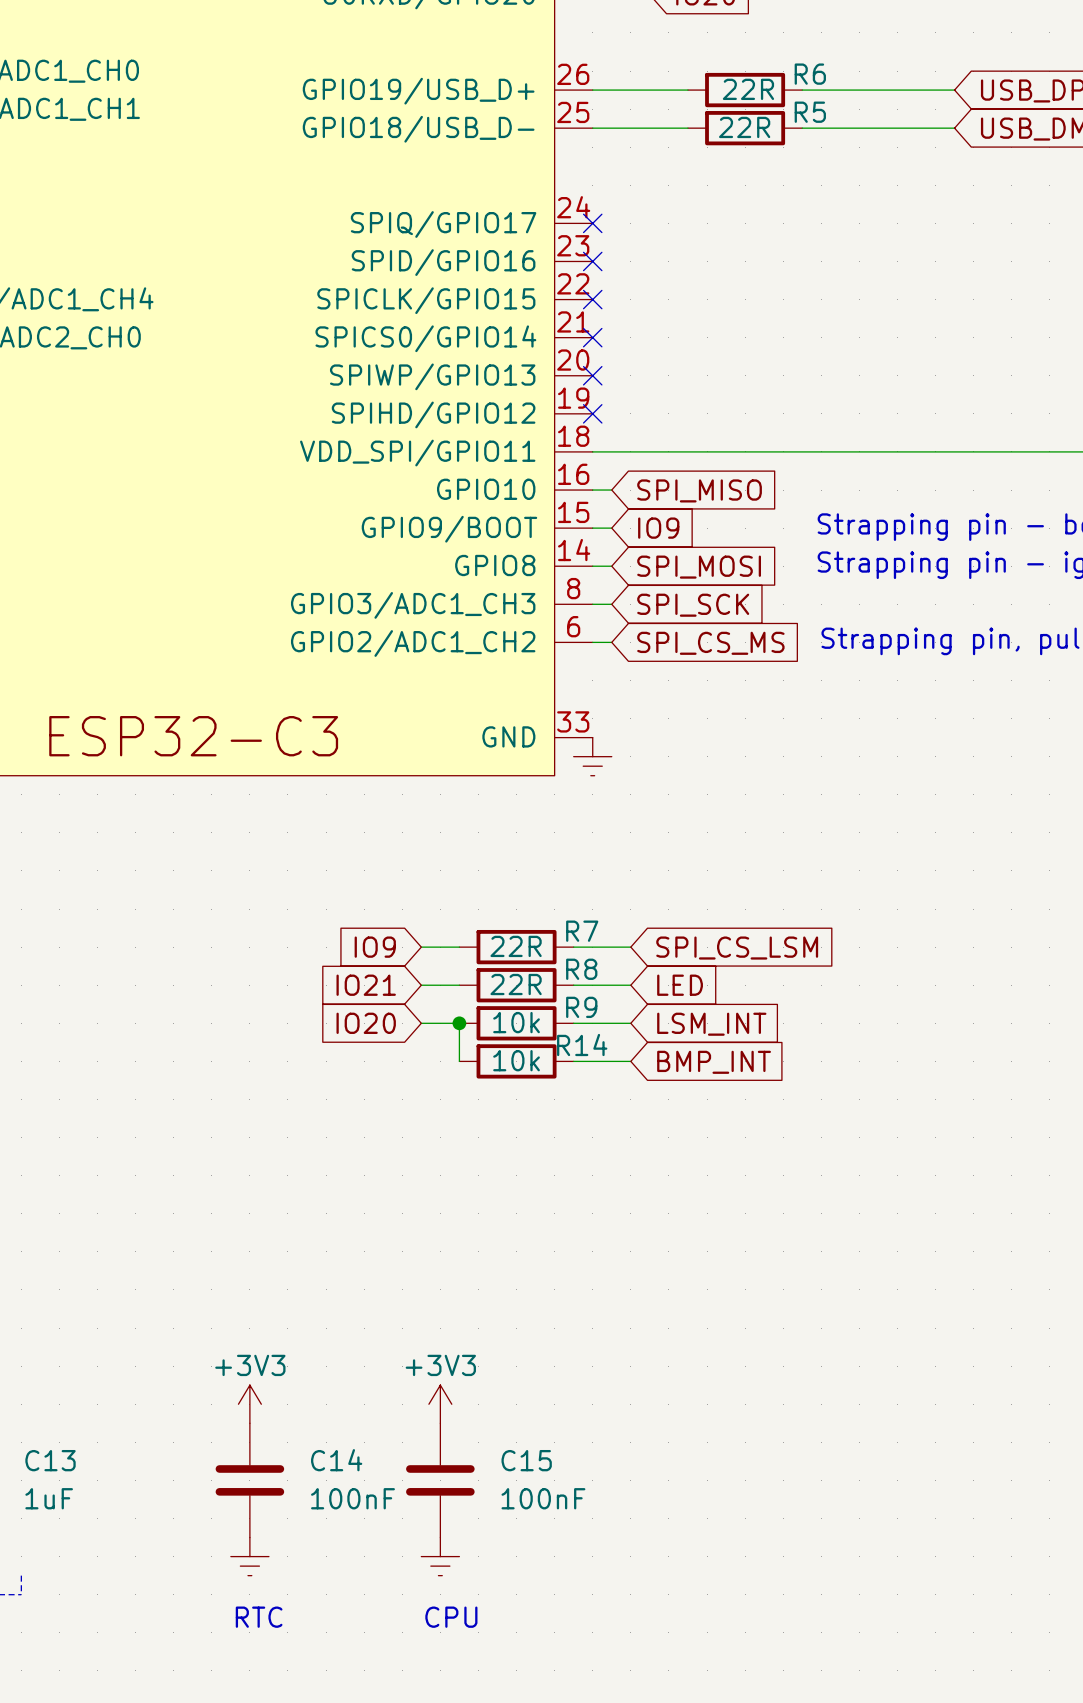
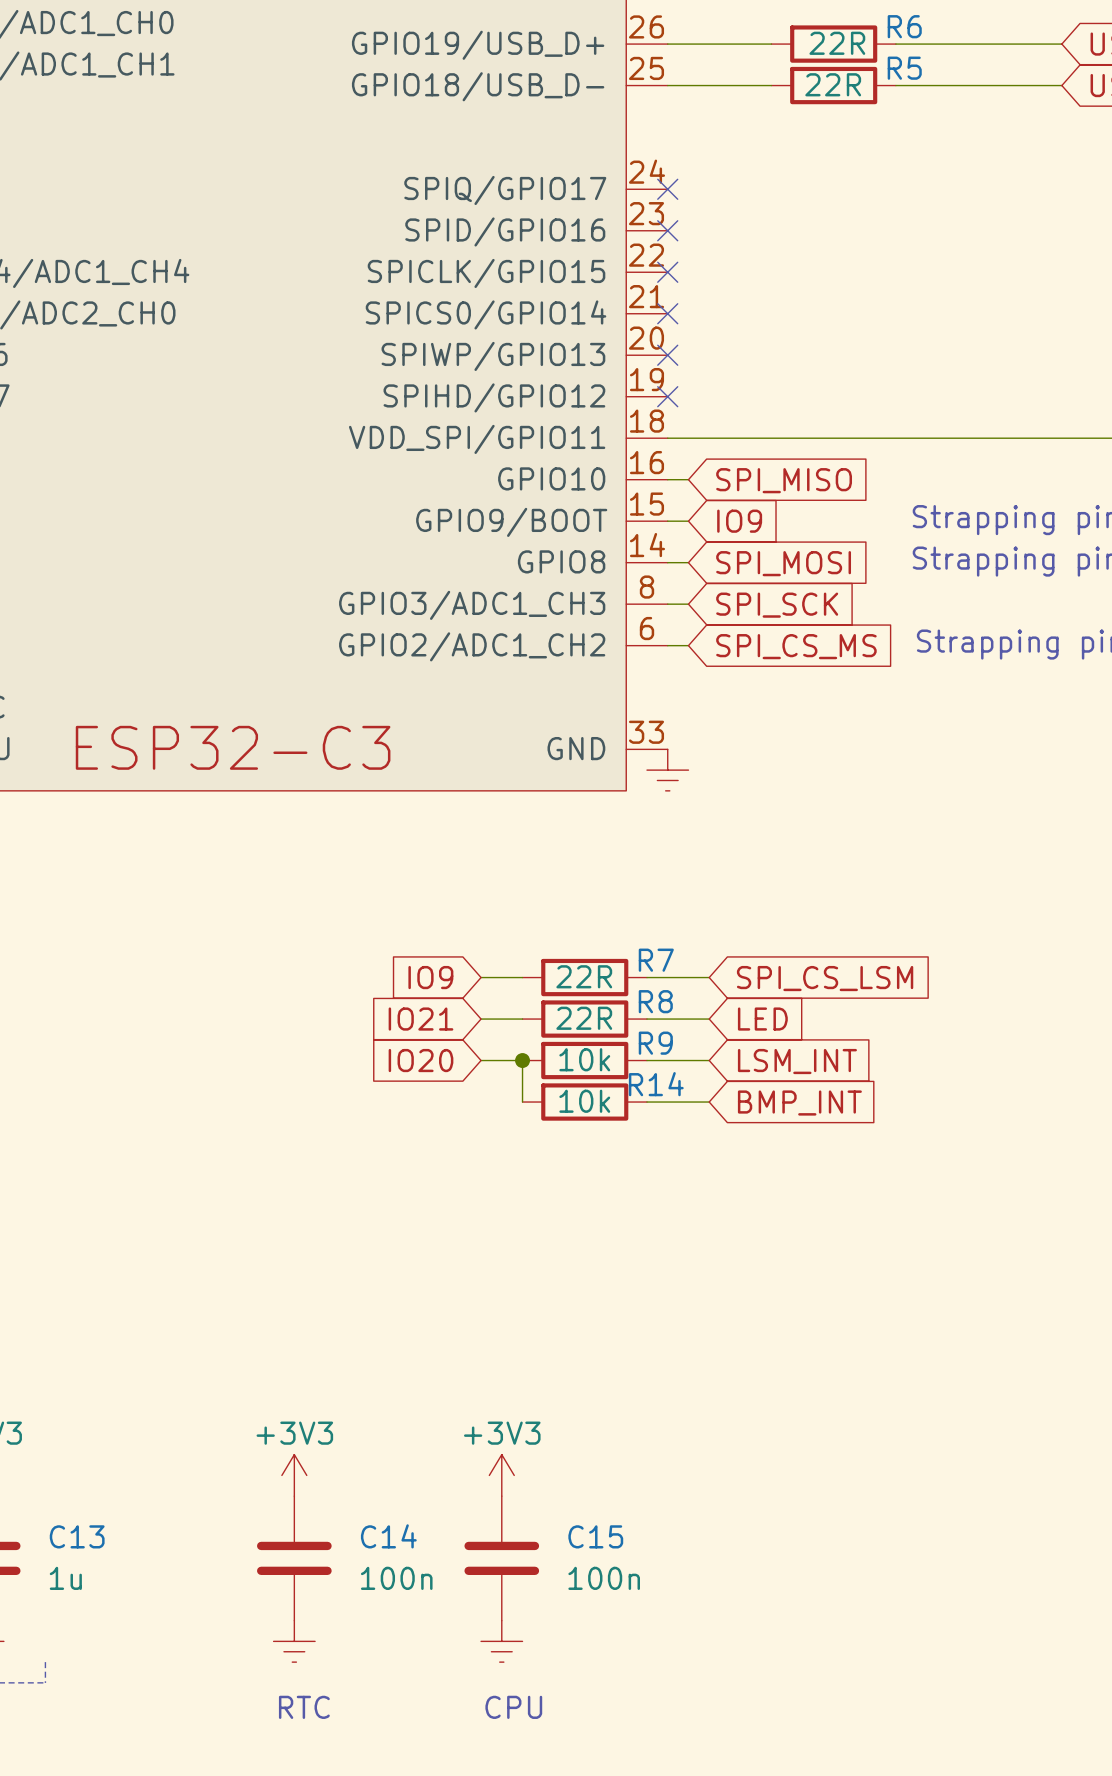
C13 value: 1uF (49, 1498) -> 1u (65, 1578)
C14 value: 100nF (352, 1498) -> 100n (396, 1578)
C15 value: 100nF (543, 1498) -> 100n (604, 1578)

